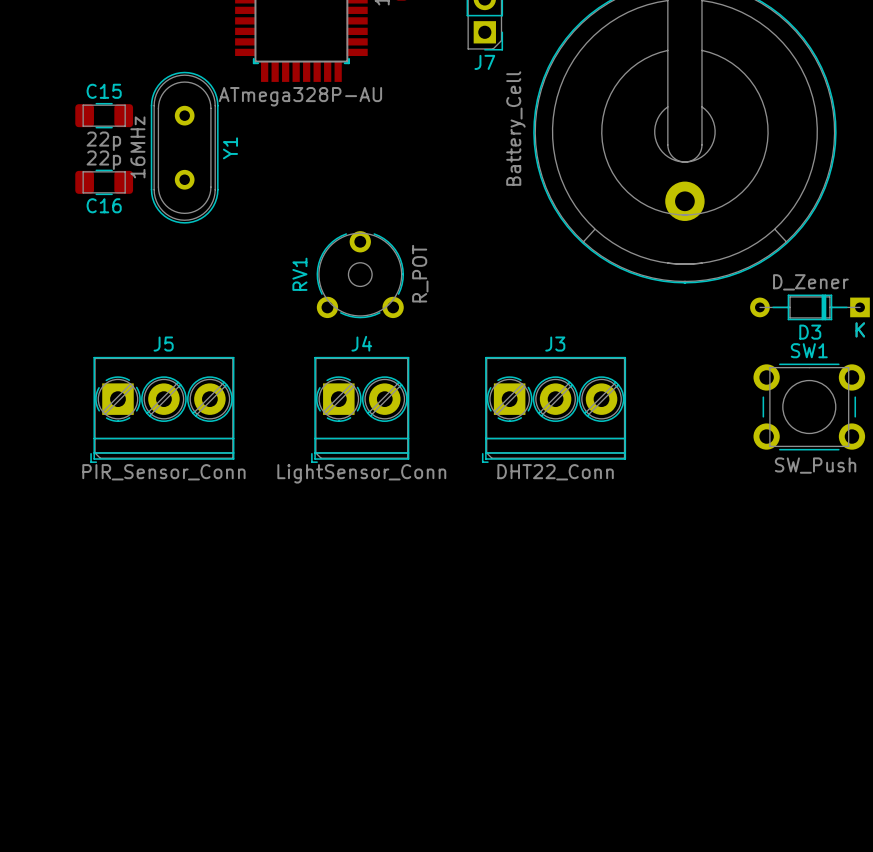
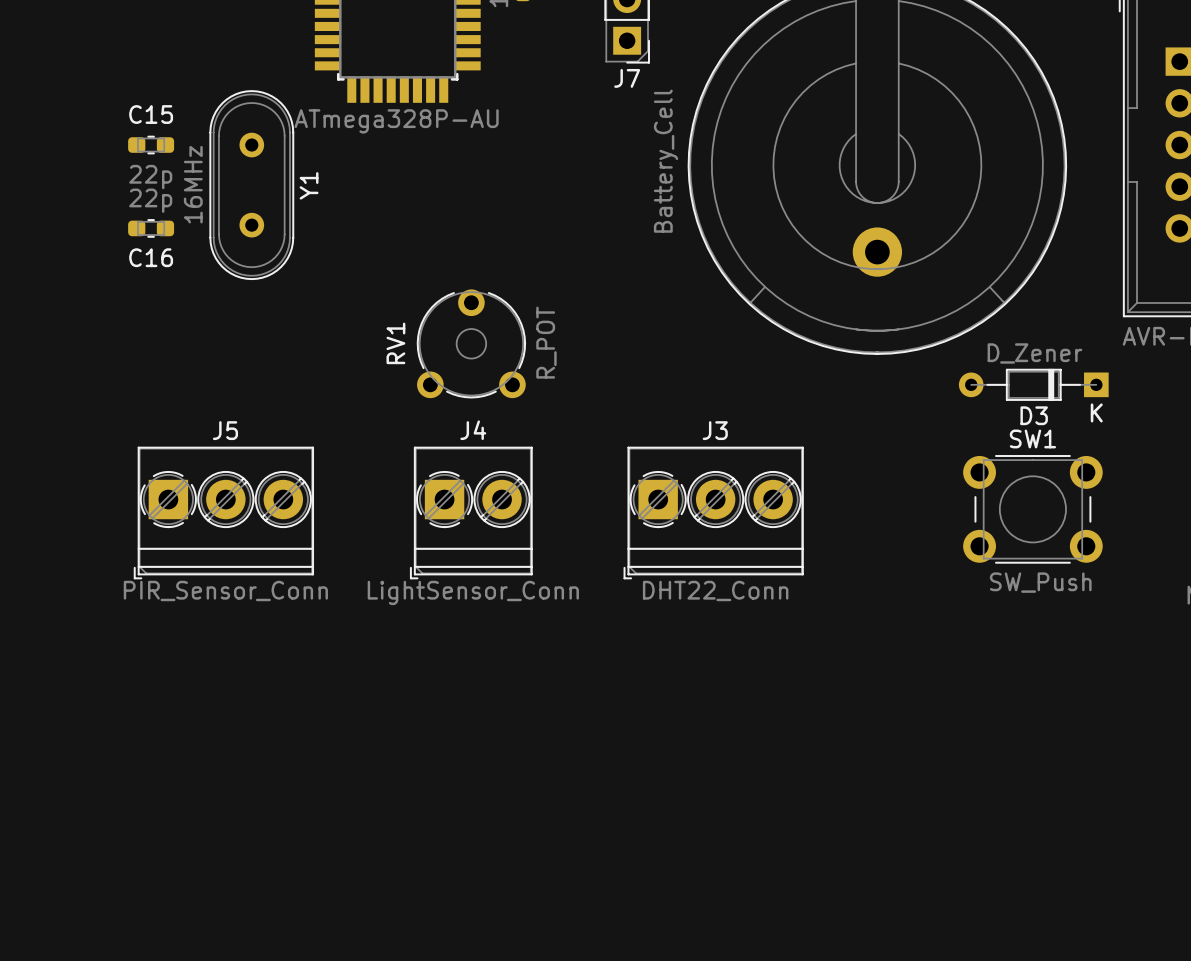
C15 footprint: [75, 102, 134, 129] -> [128, 135, 175, 155]
C16 footprint: [75, 169, 134, 196] -> [128, 219, 175, 238]

